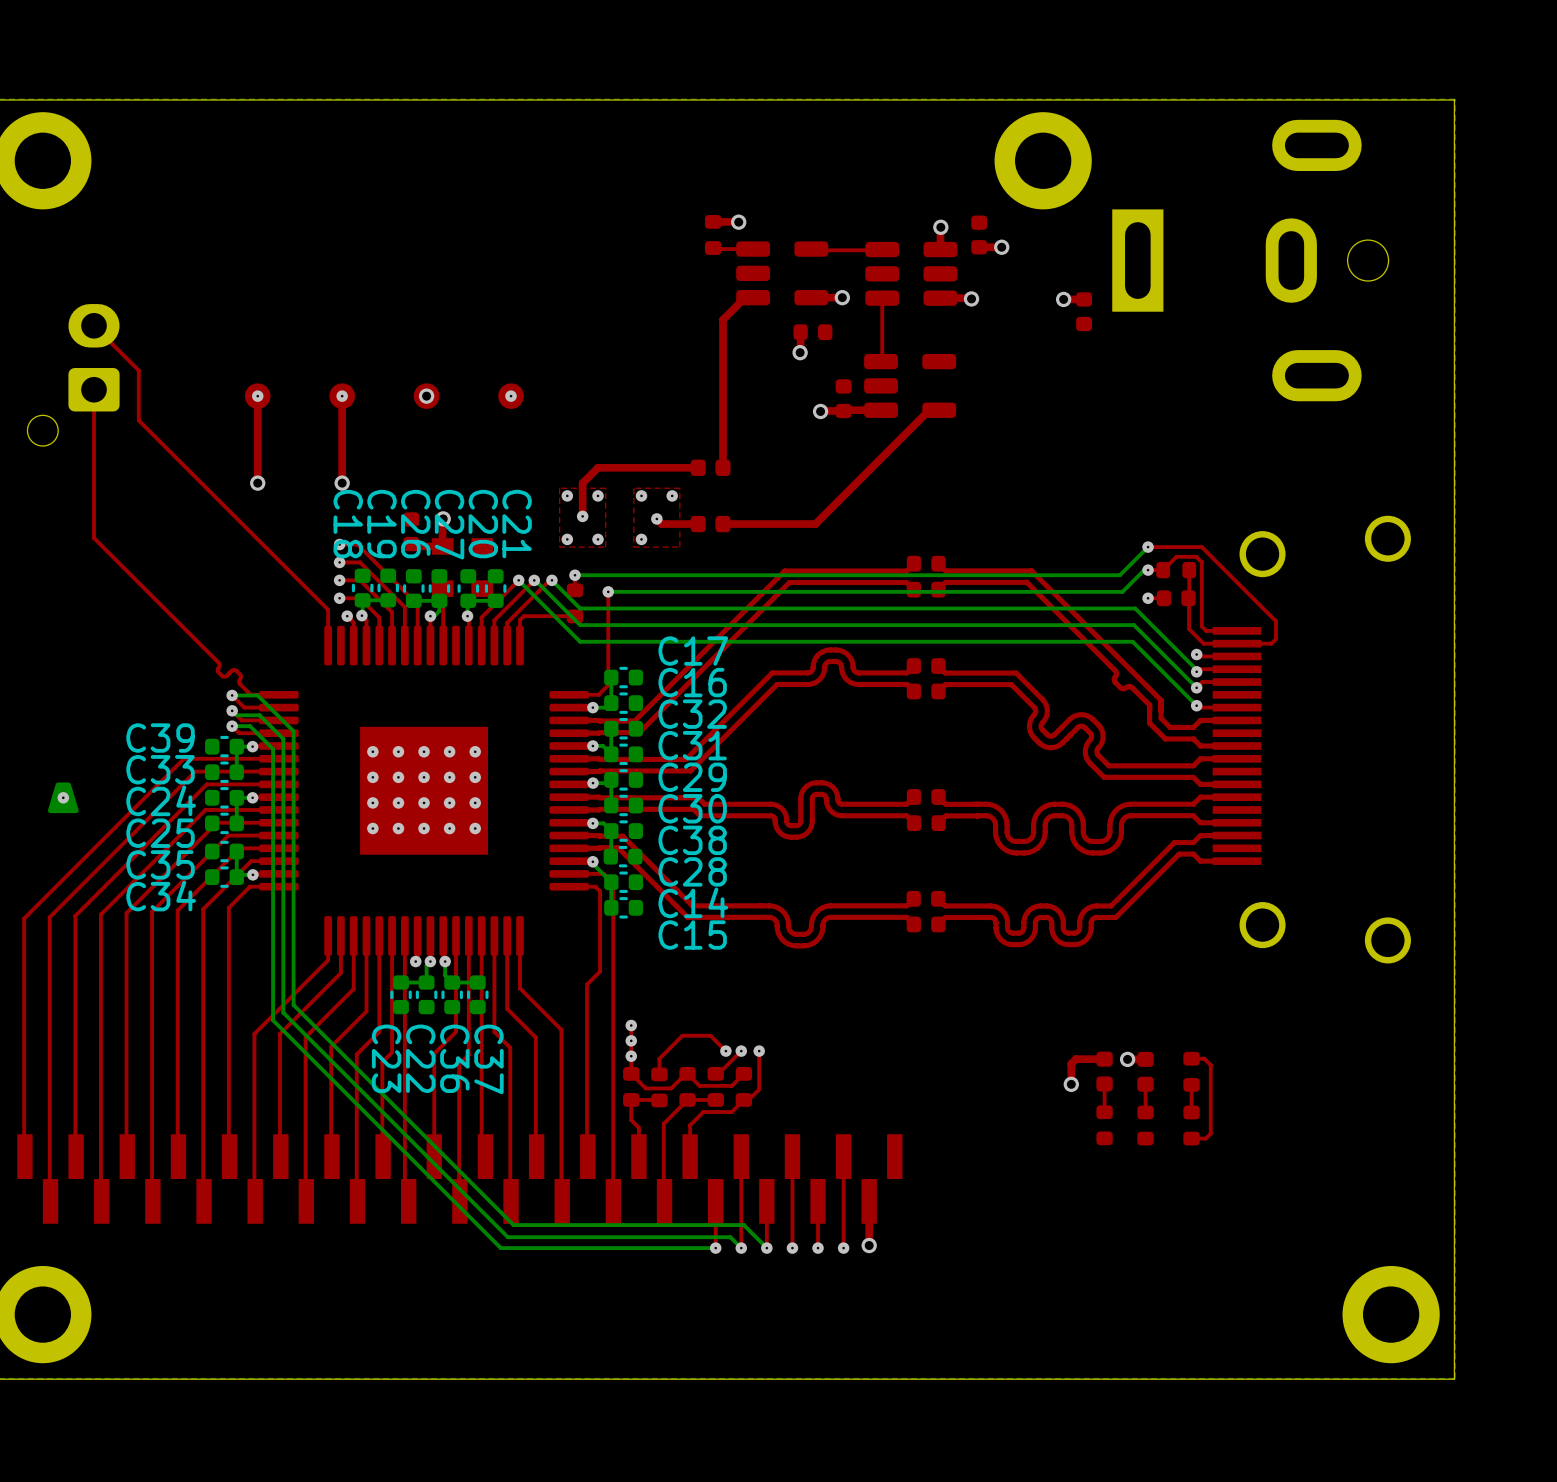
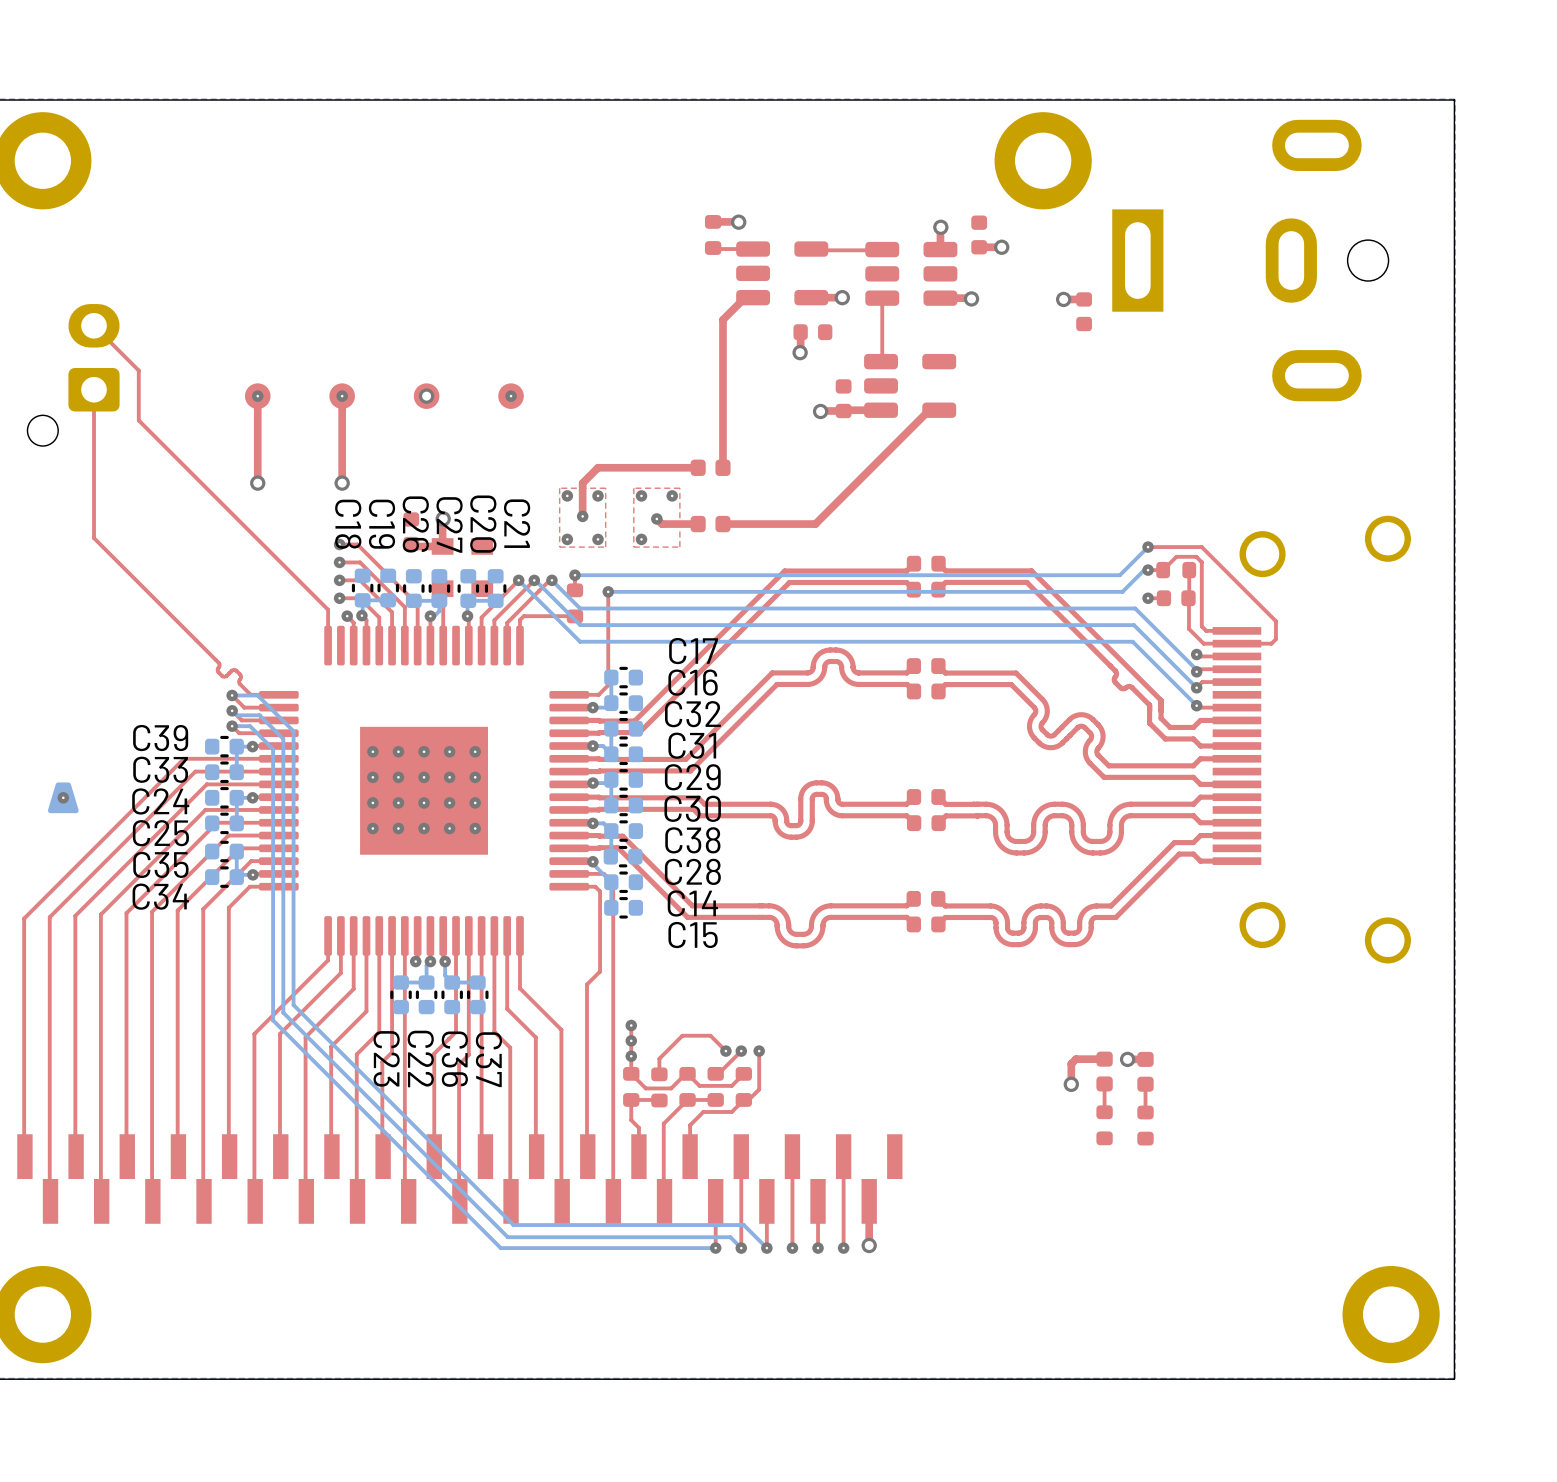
top track: (1191, 1058) (1204, 1058) (1210, 1065) (1210, 1133) (1205, 1138) (1191, 1138) -> none
part: (1191, 1071) -> none
top track: (1191, 1084) (1191, 1112) -> none
part: (1191, 1125) -> none

